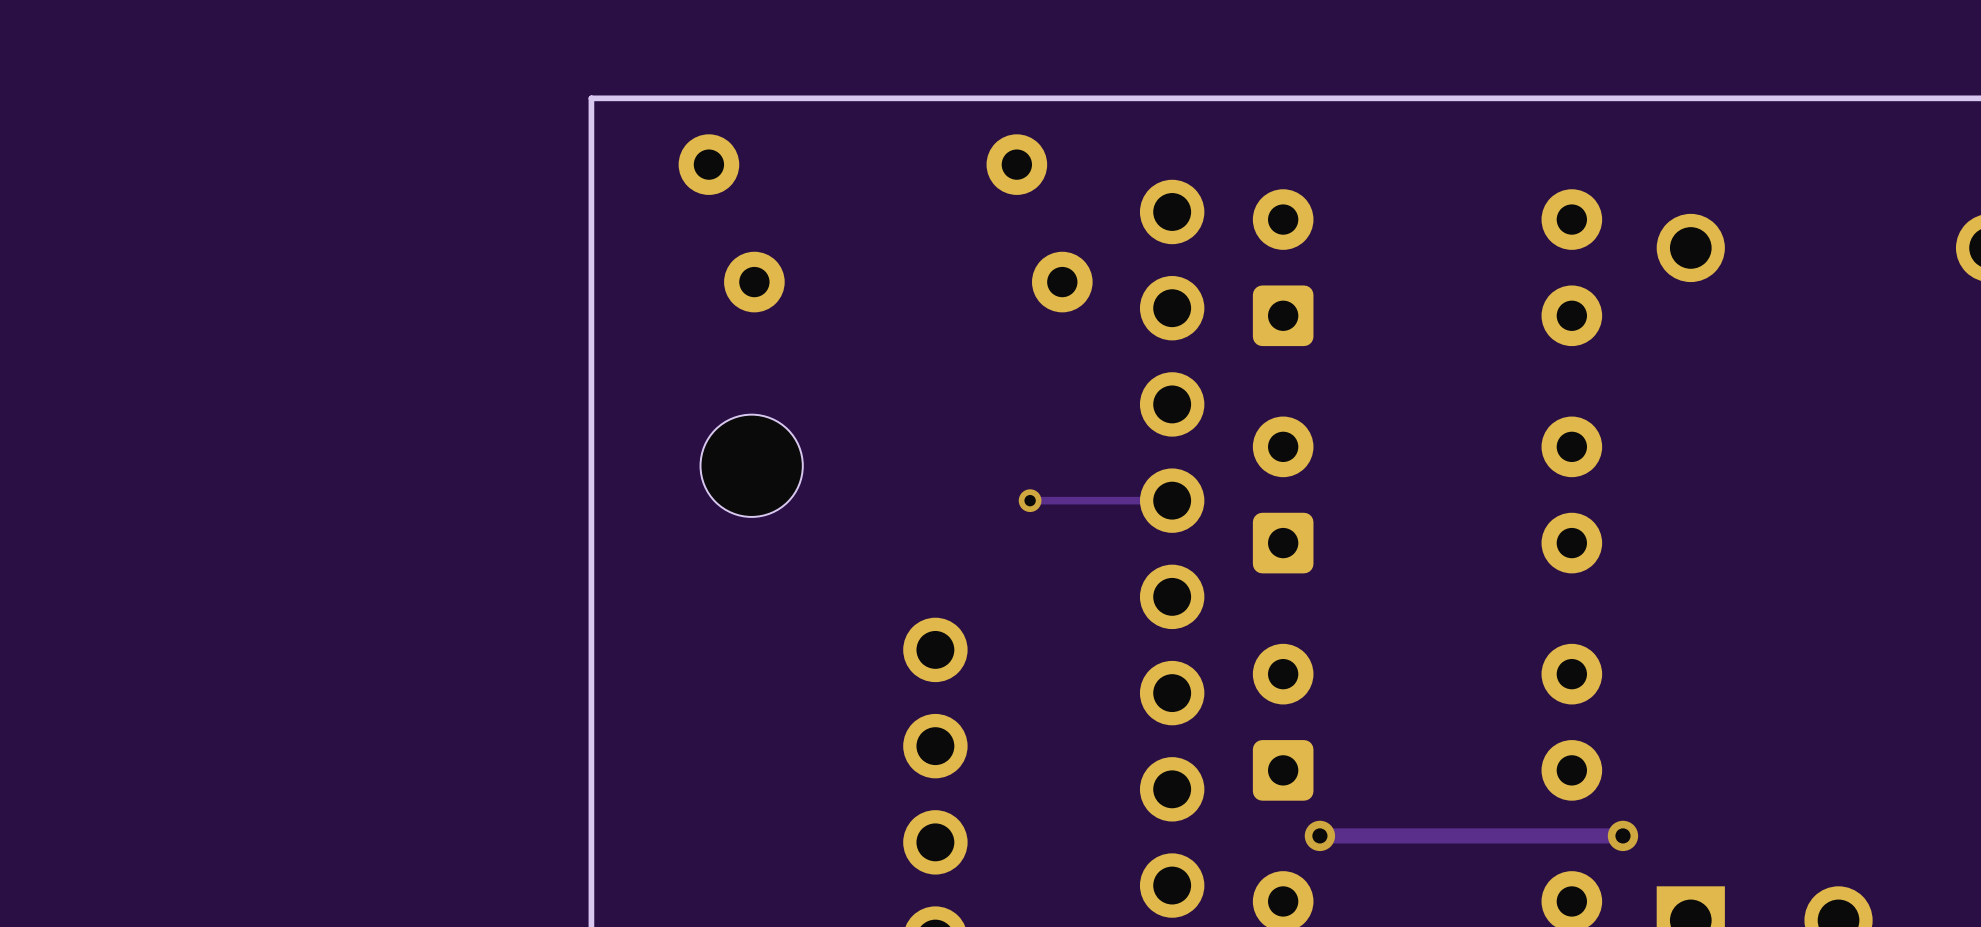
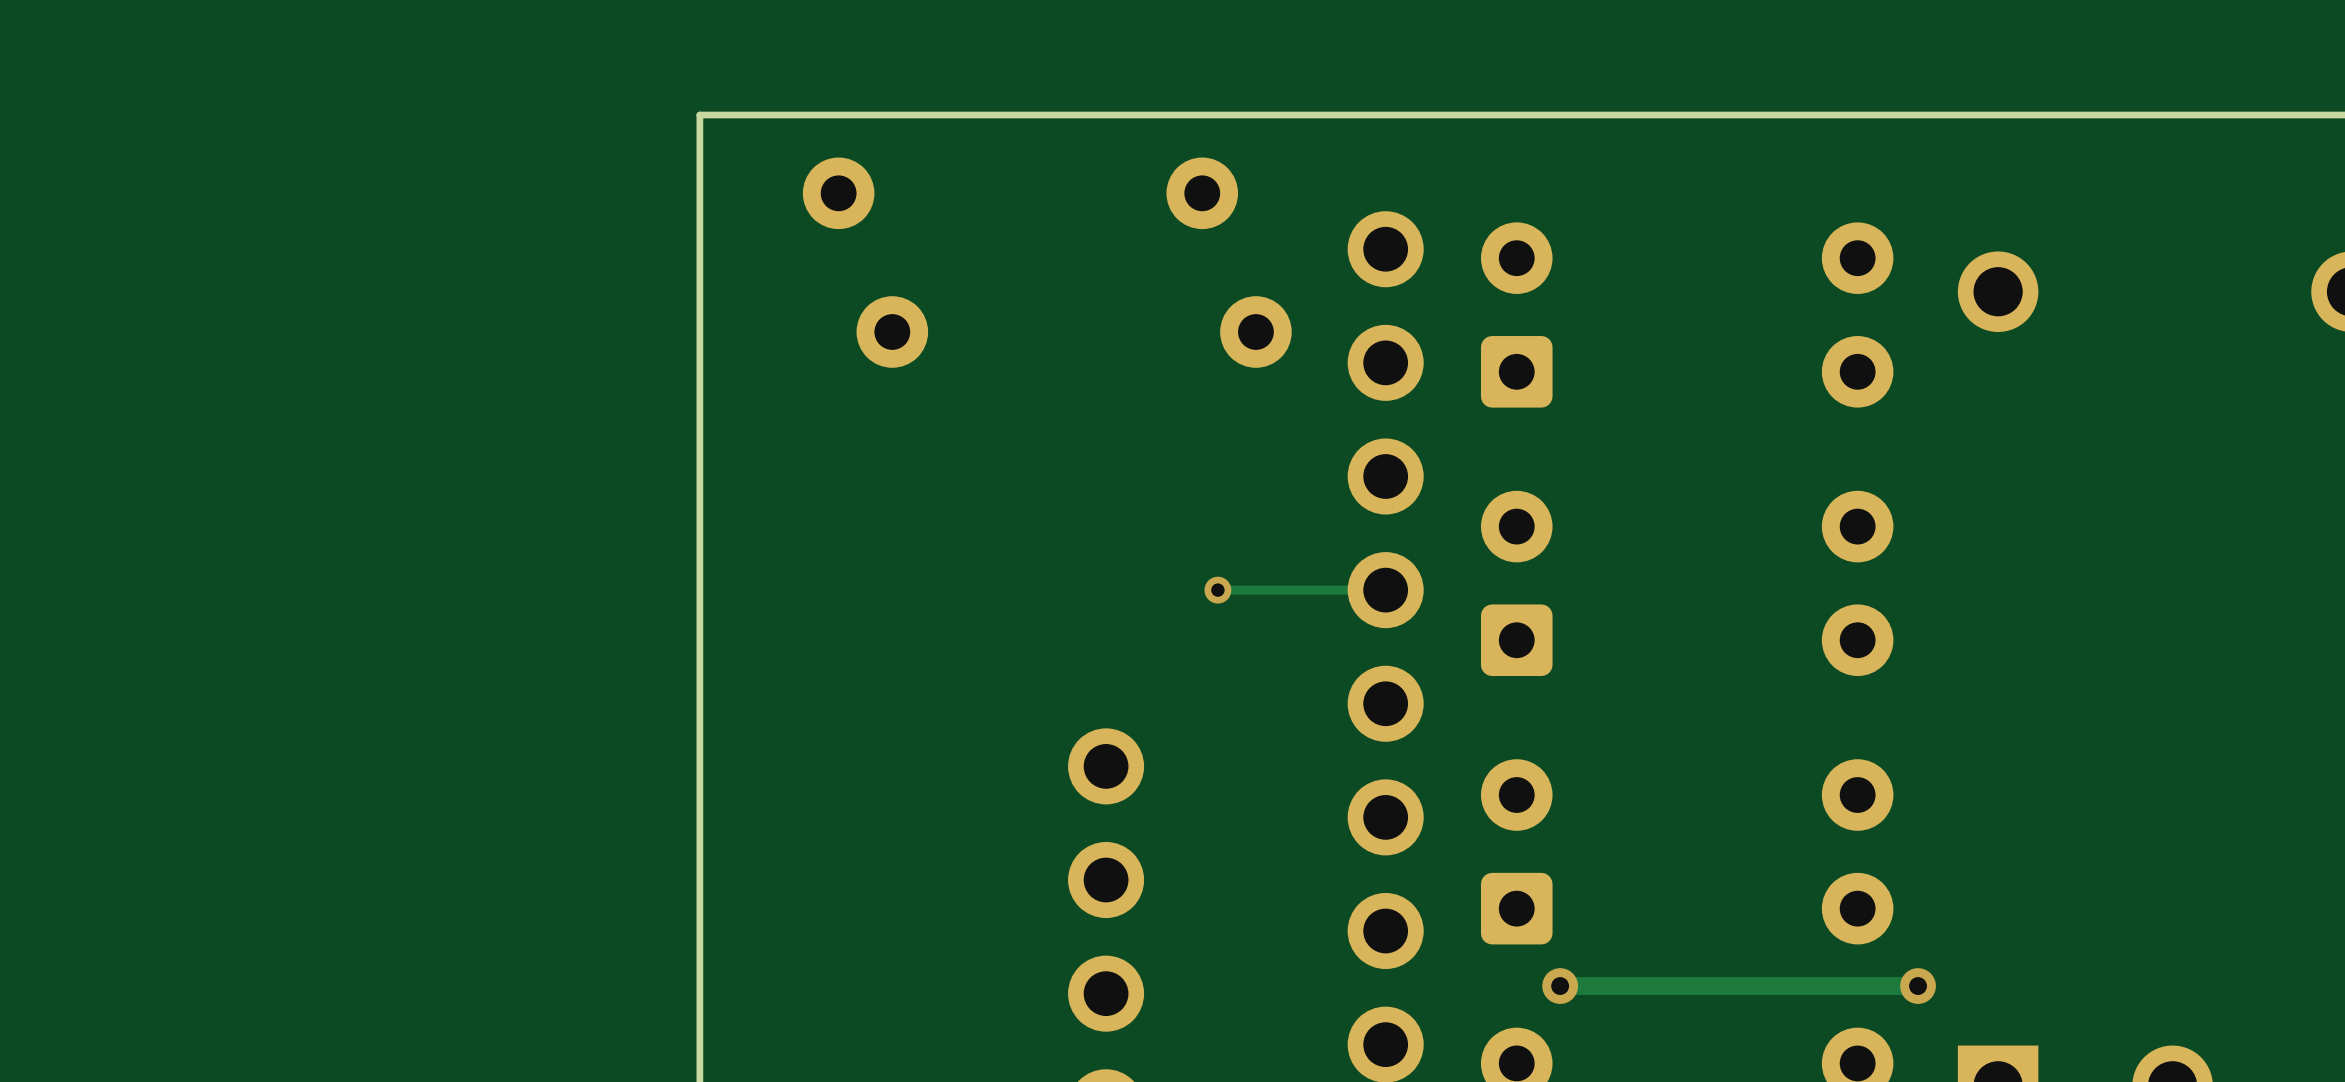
part: (751, 465) -> none

